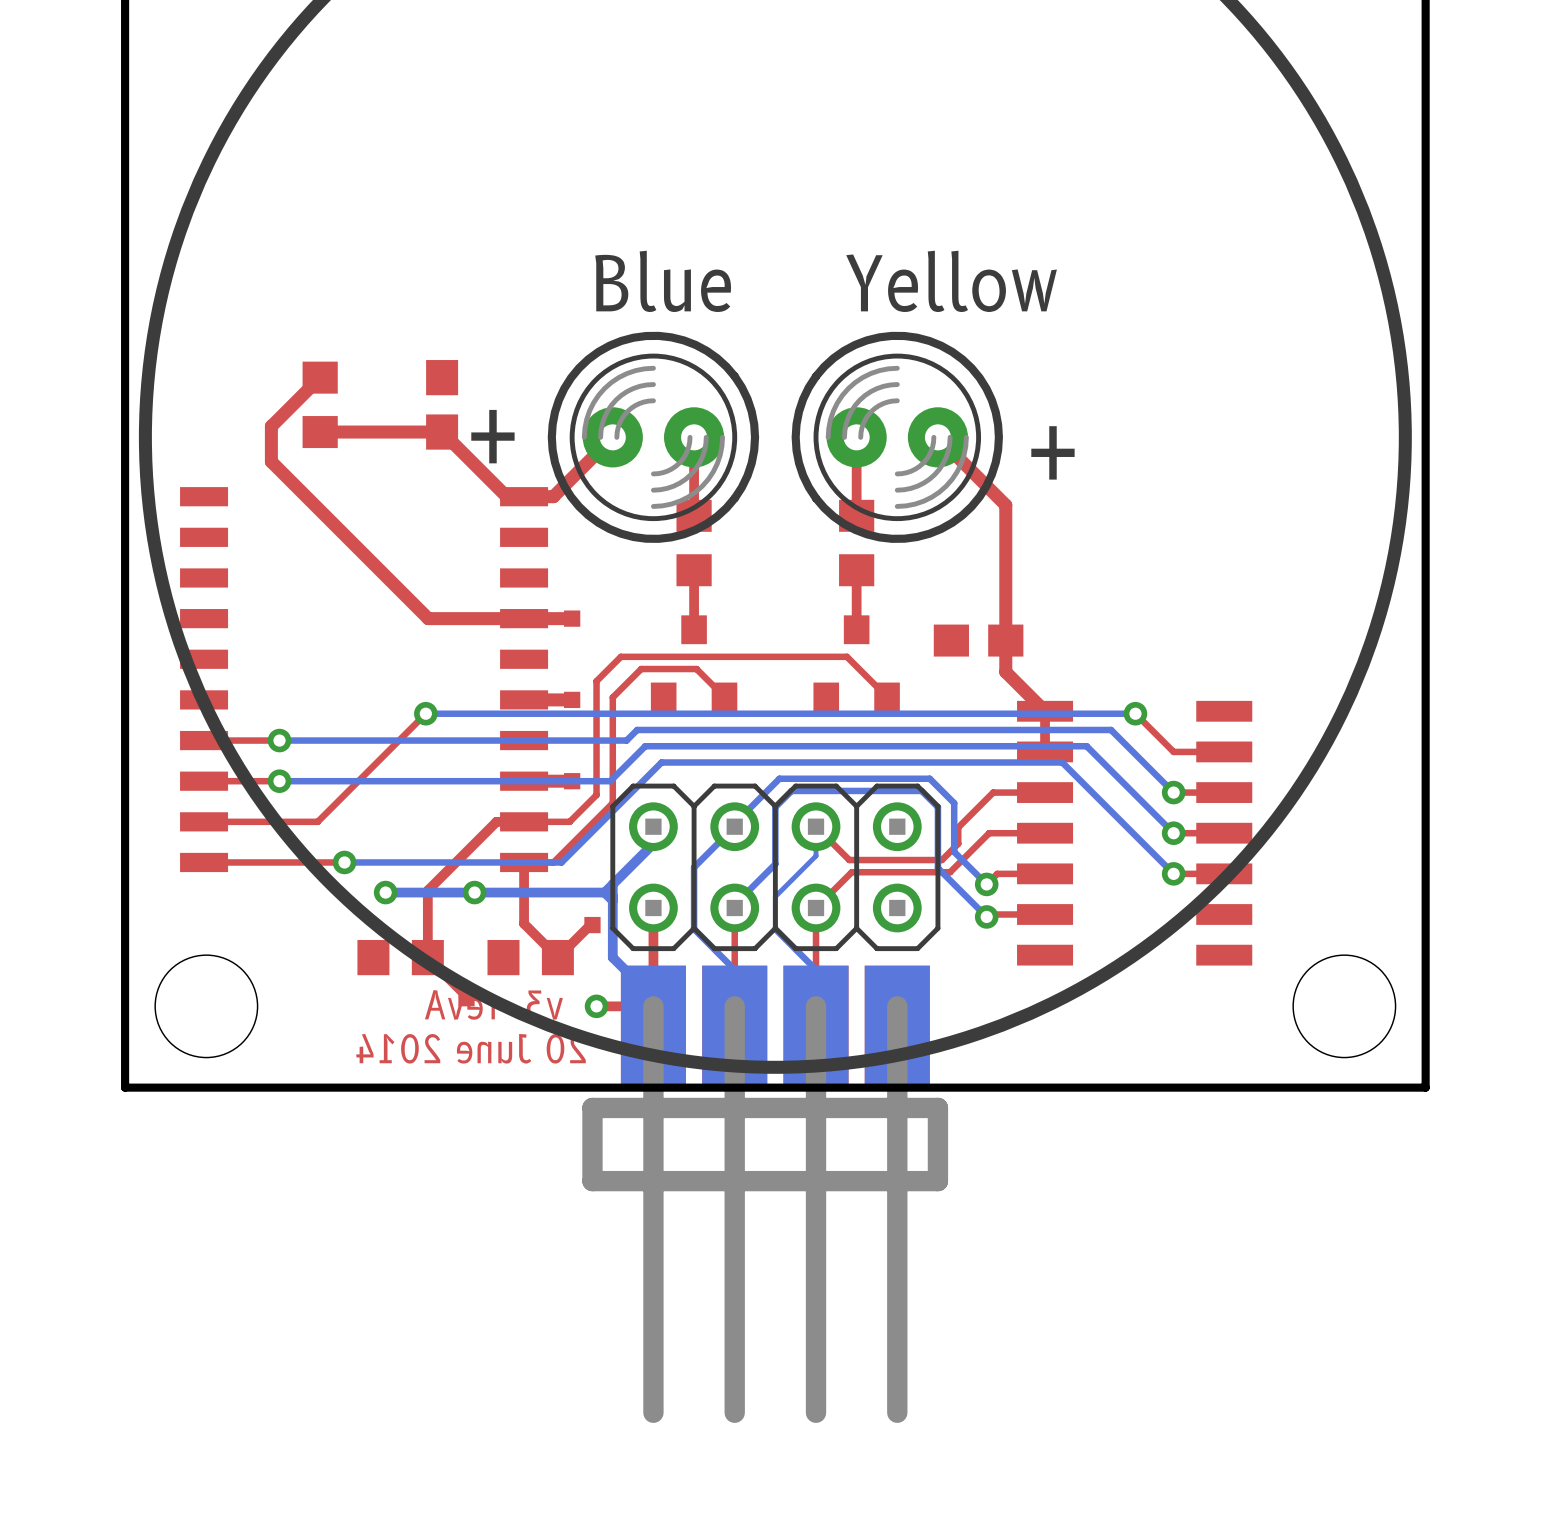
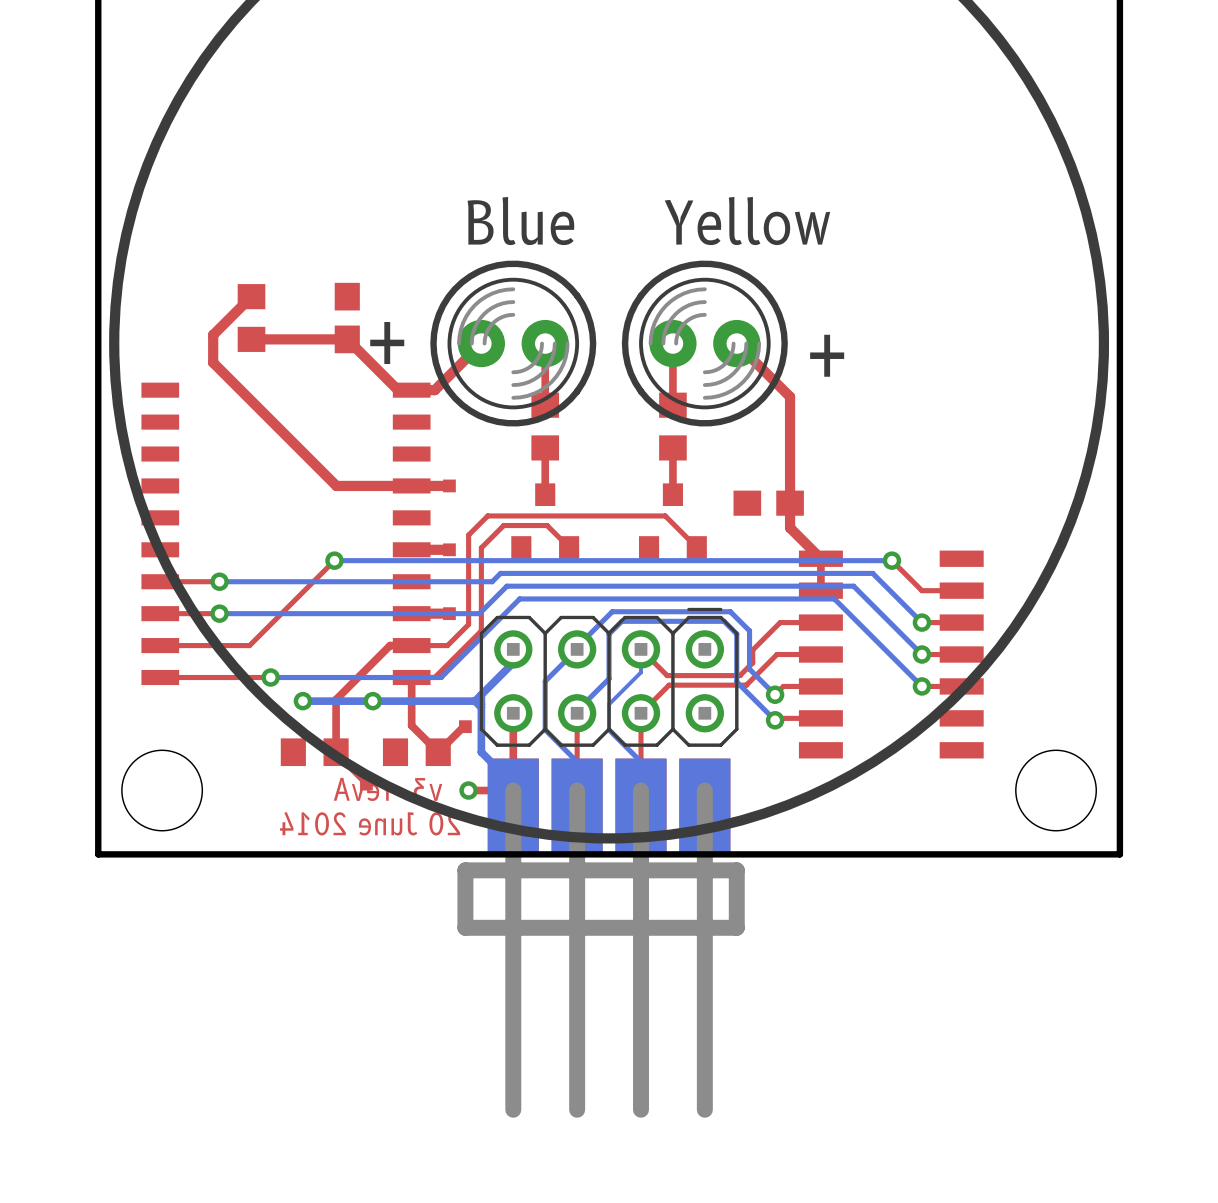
part footprint: [610, 783, 941, 952] -> [479, 607, 739, 747]

